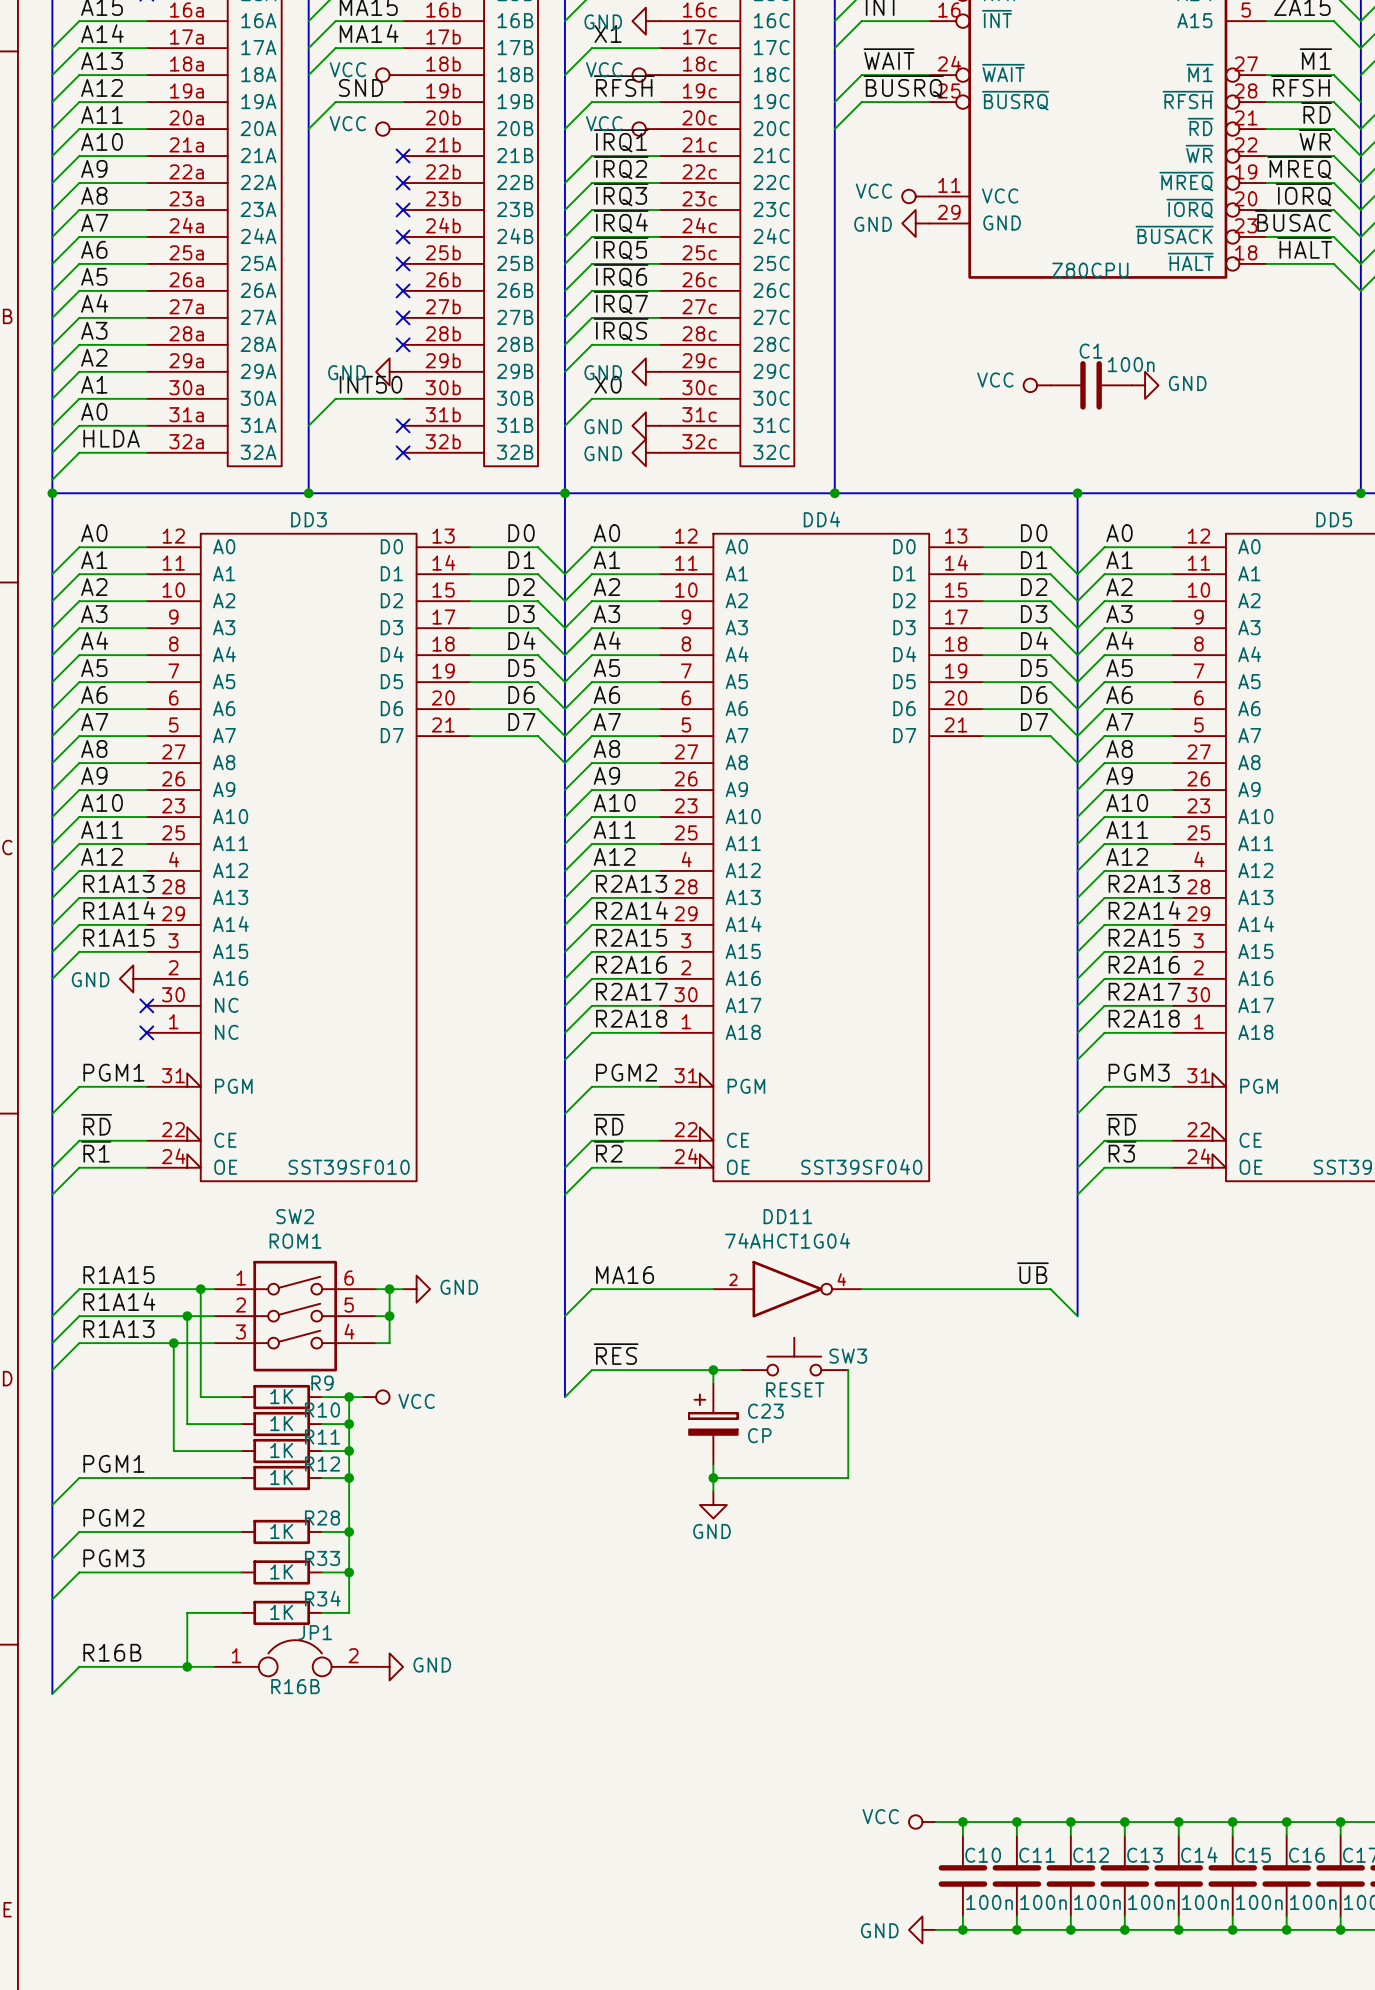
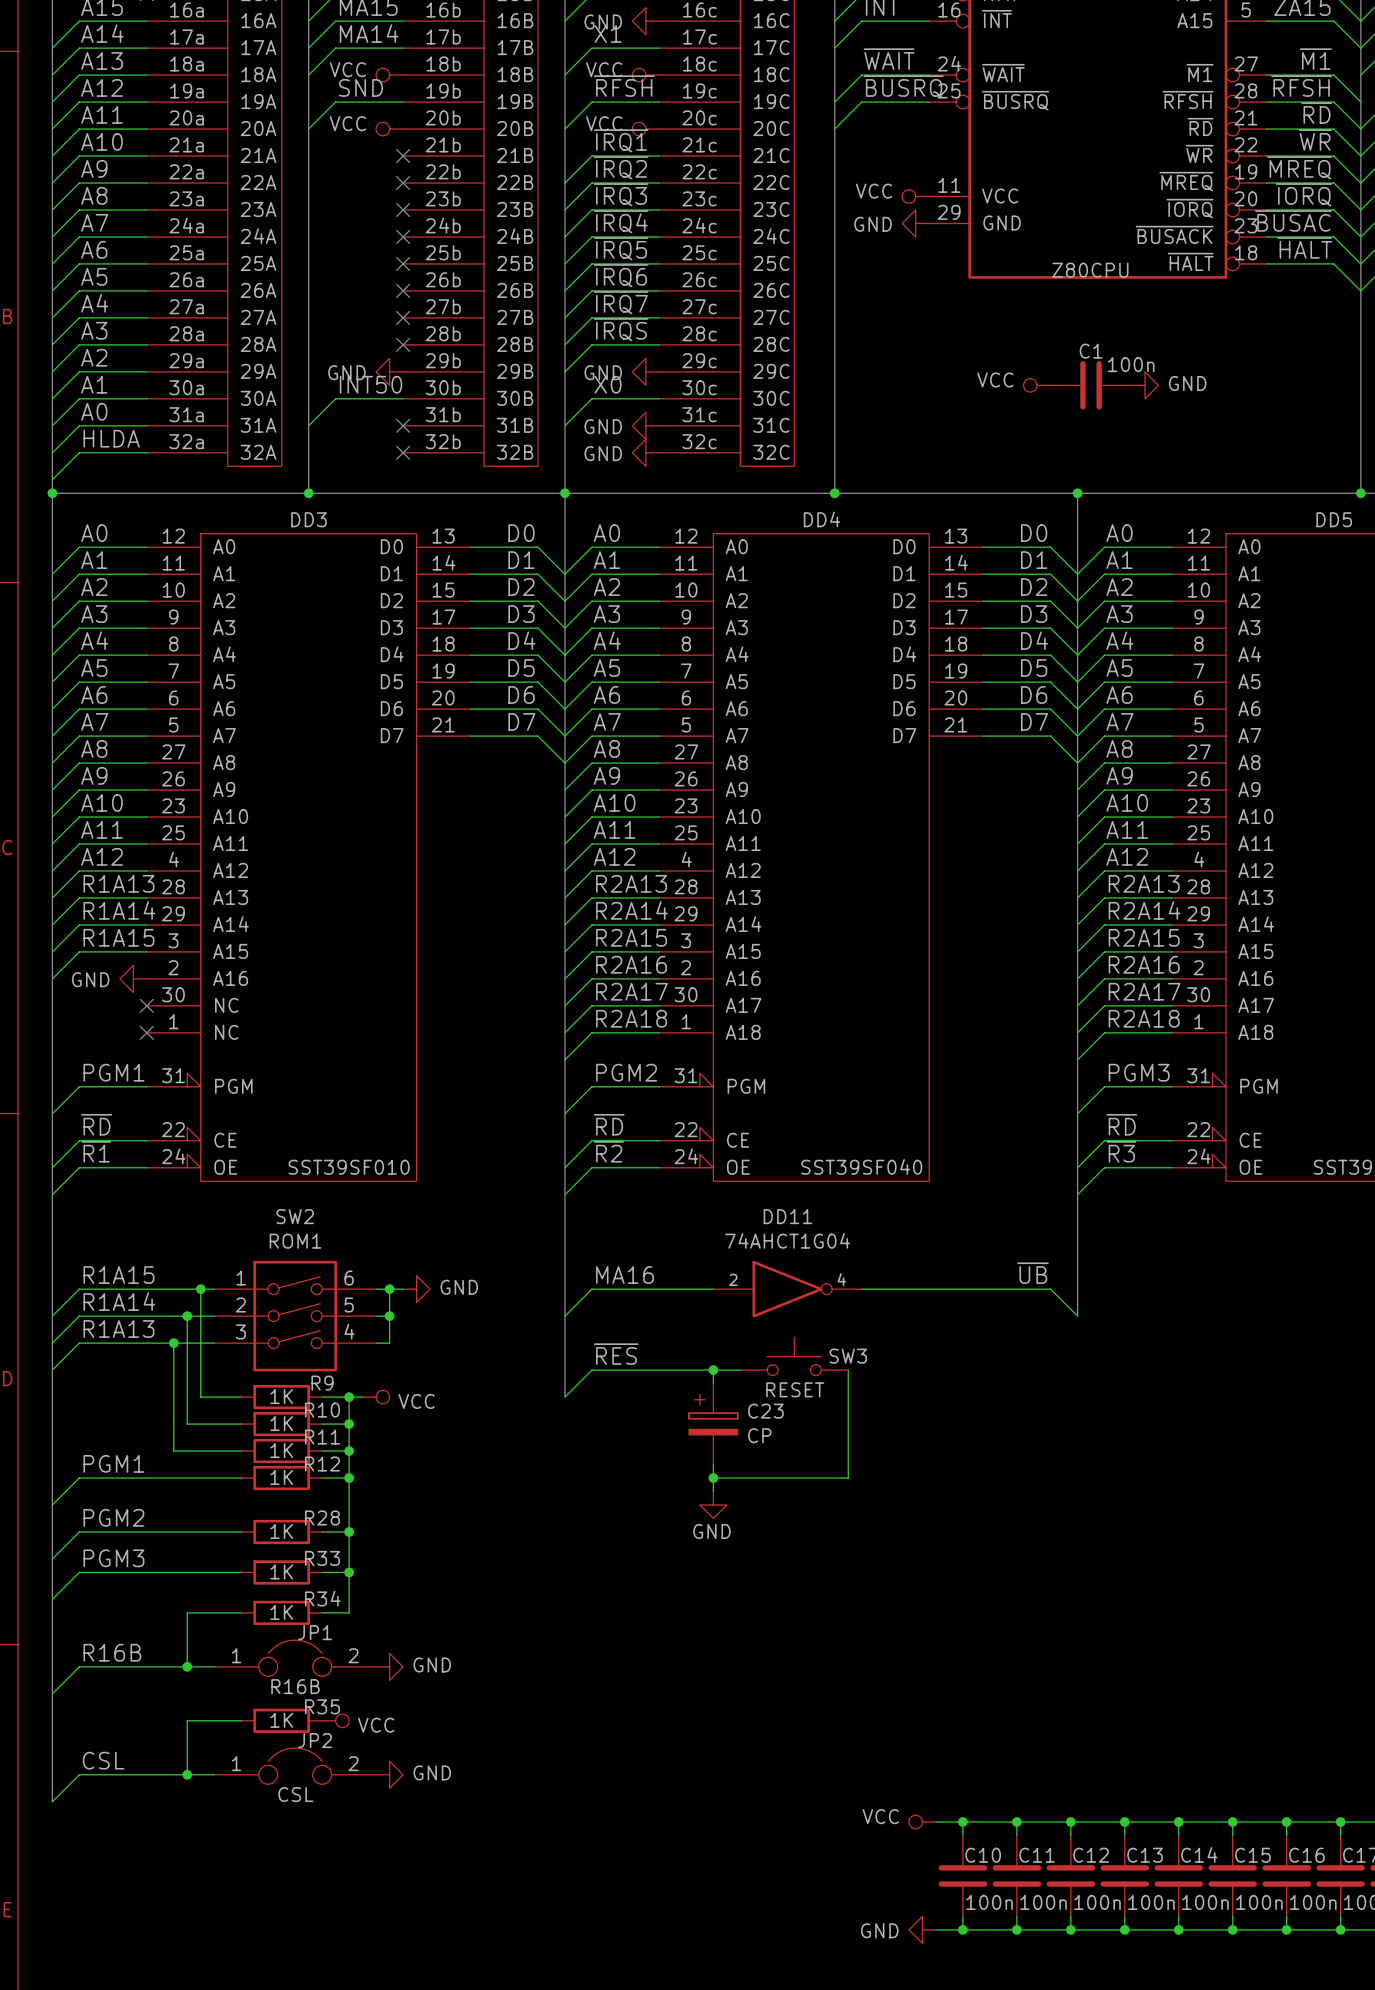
bus: none -> (52, 1693) (52, 1801)
wire: none -> (241, 1720) (187, 1720) (187, 1774)
R35: none -> 1K (281, 1720)
power symbol: none -> VCC (335, 1720)
label: none -> CSL (103, 1760)
JP2: none -> CSL (295, 1766)
junction: none -> (187, 1774)
wire: none -> (214, 1774) (79, 1774) (52, 1801)
power symbol: none -> GND (389, 1774)

